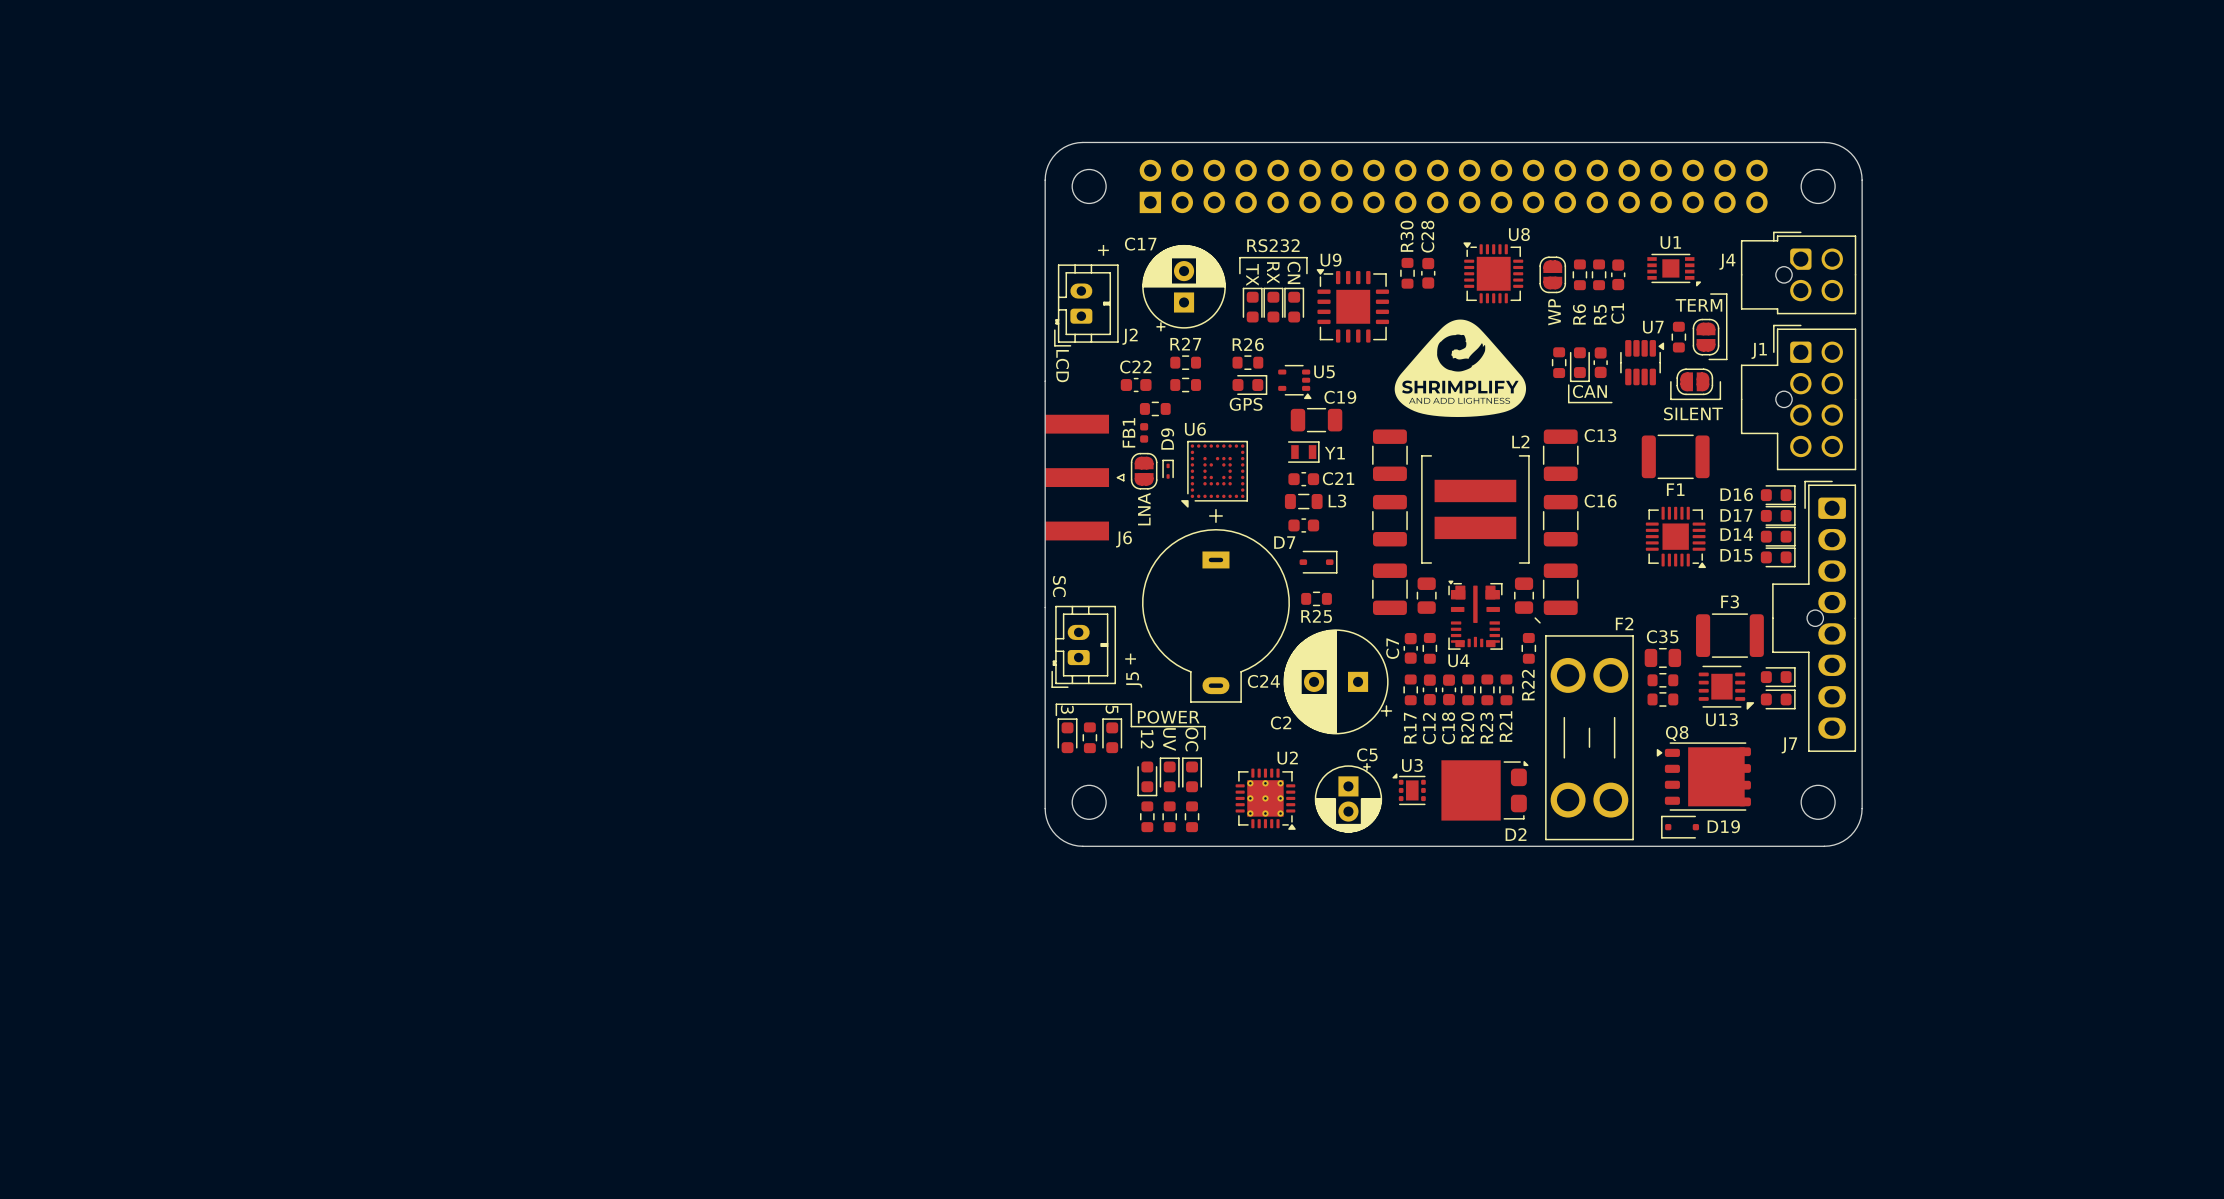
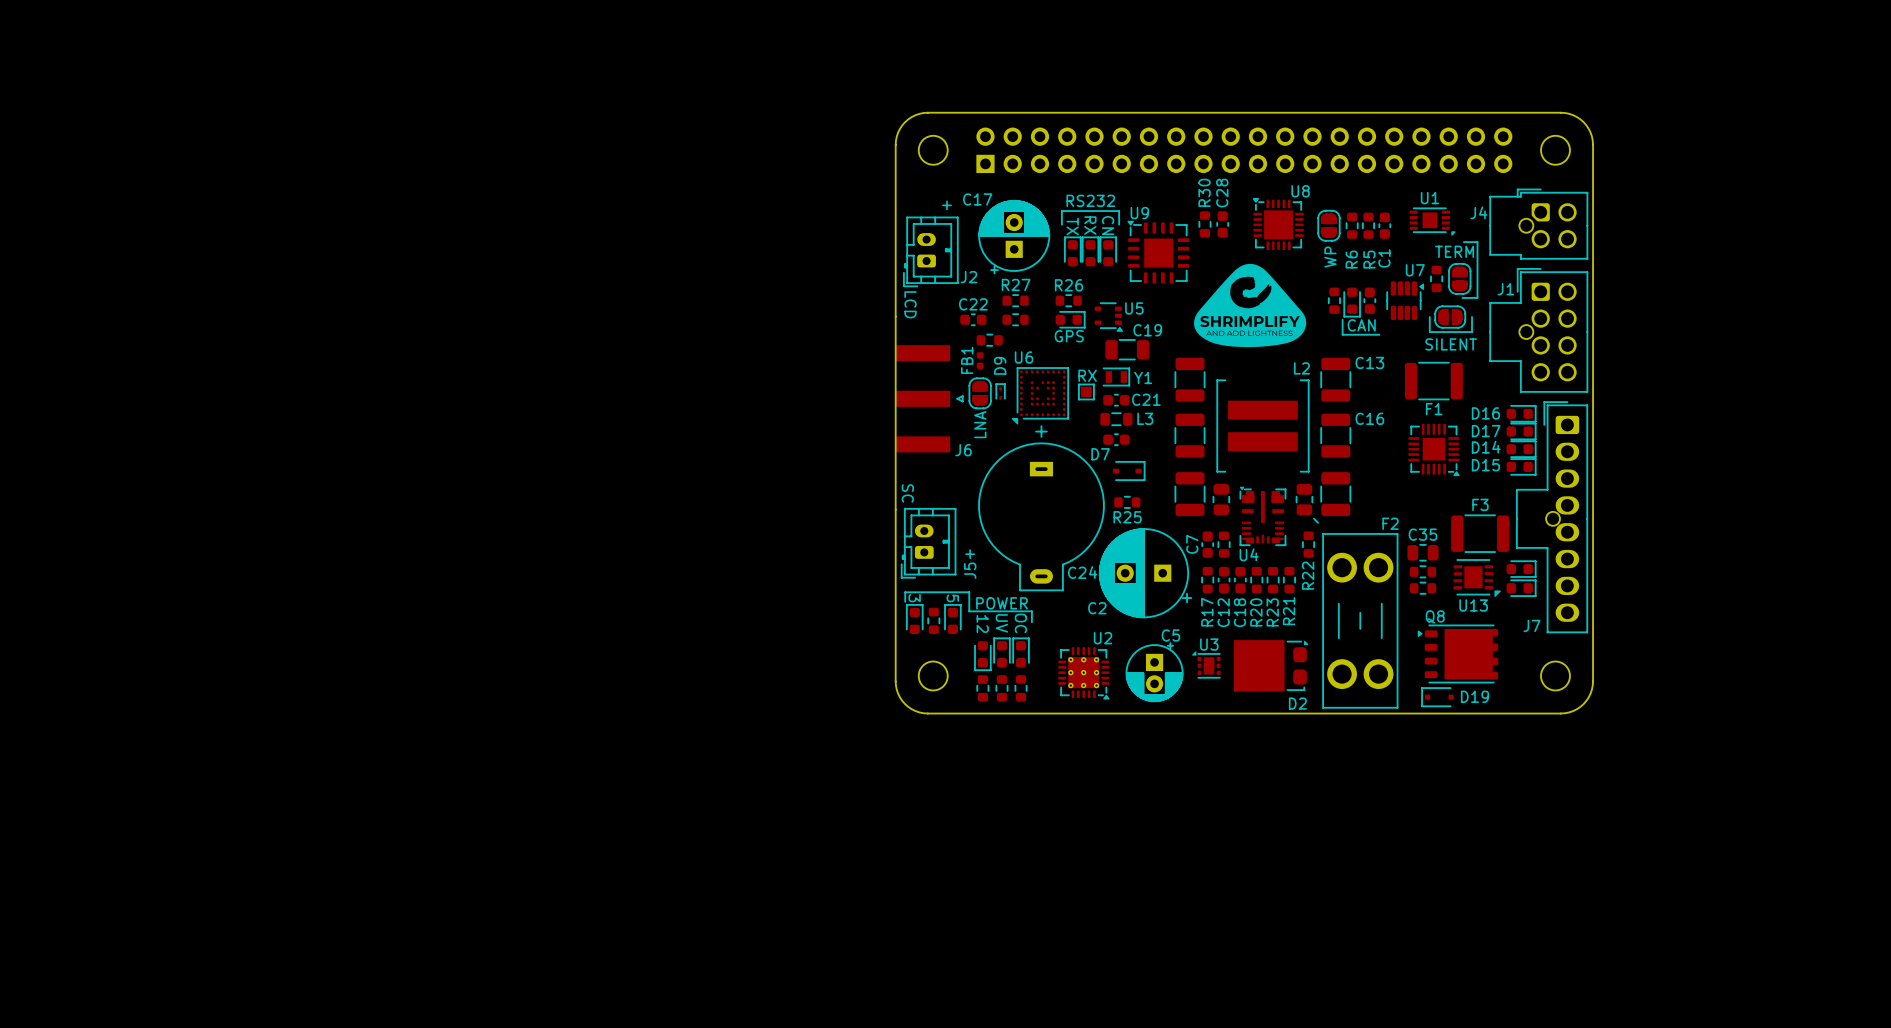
text: none -> RX (1087, 375)
part: none -> (1086, 391)

